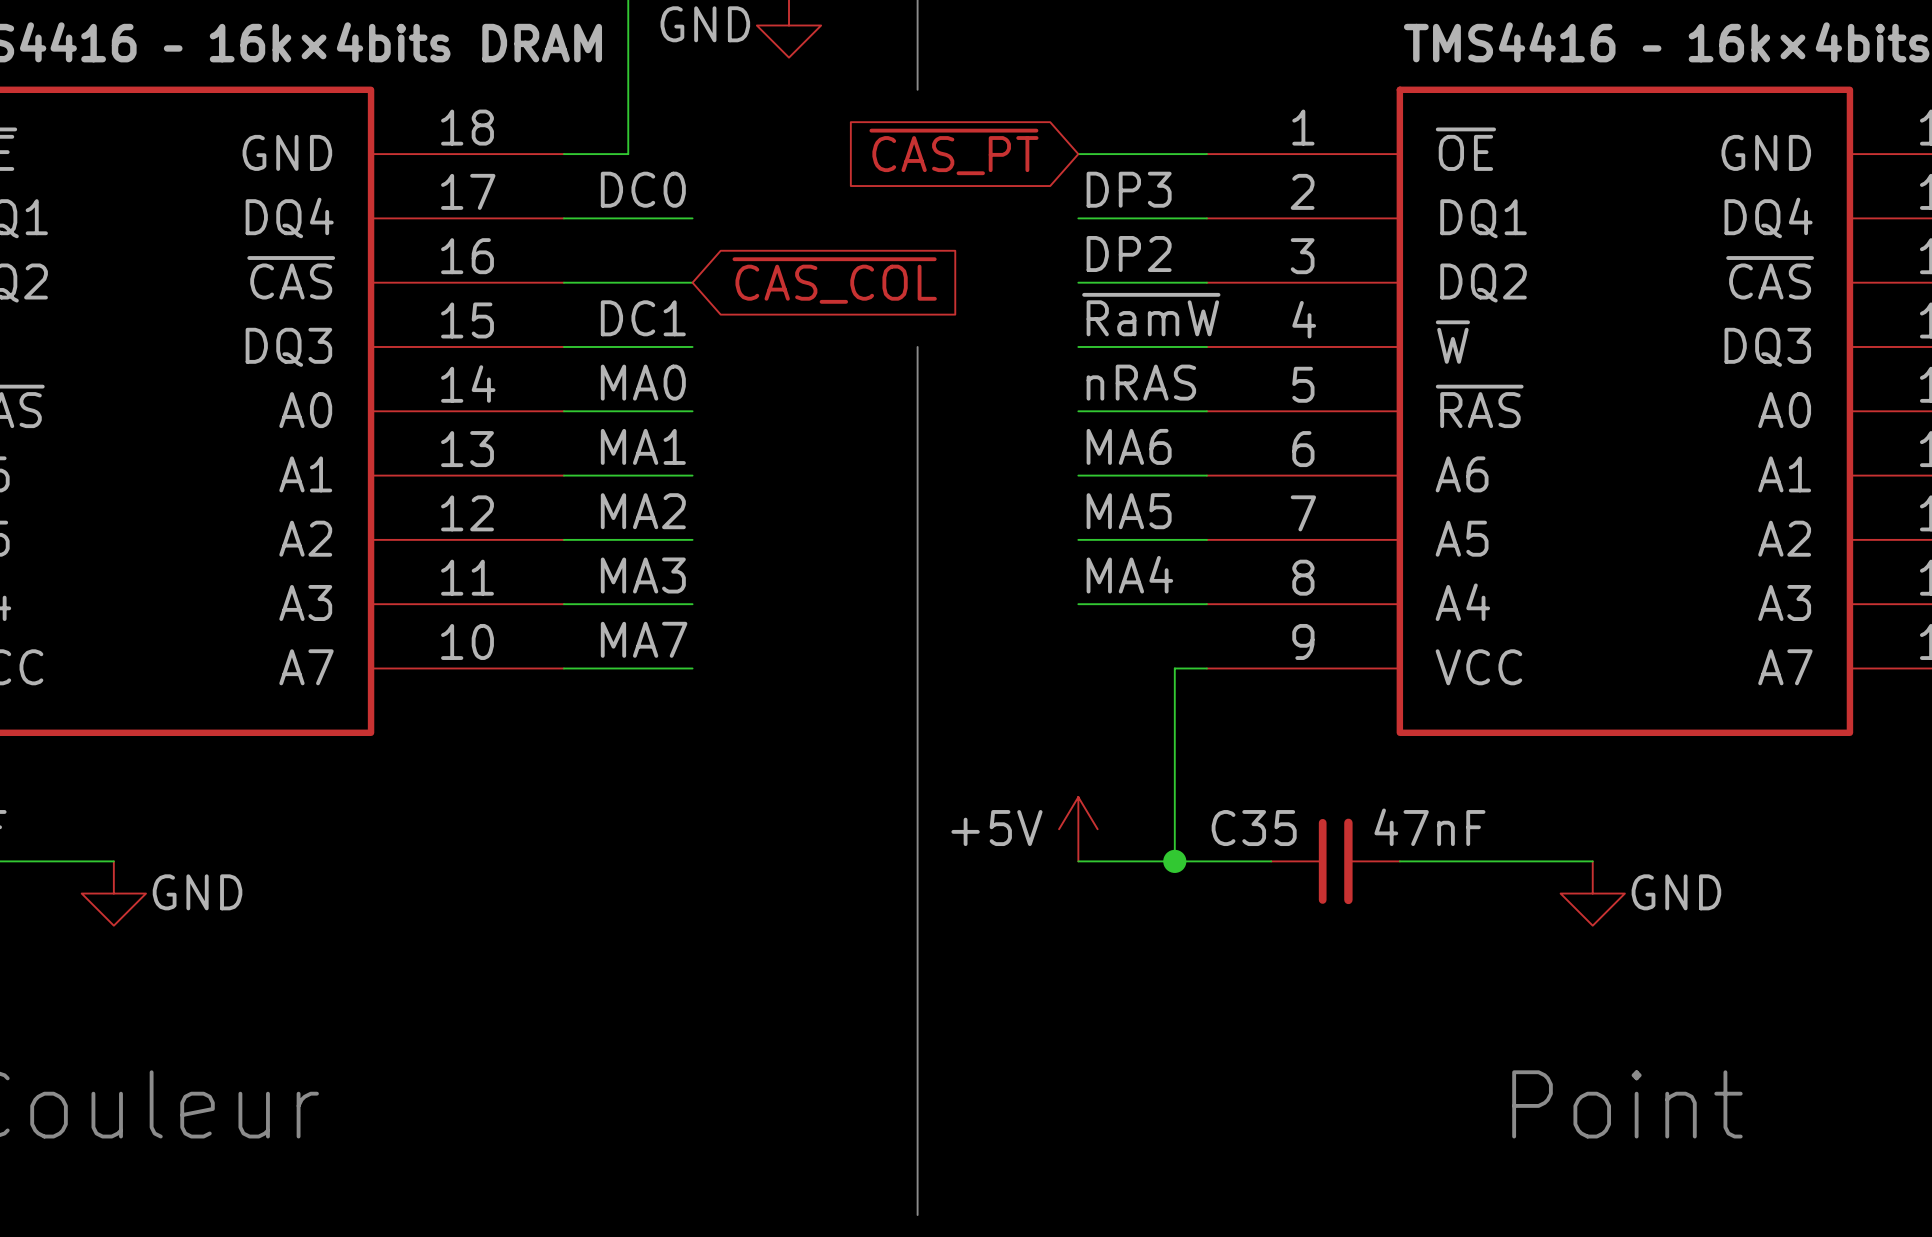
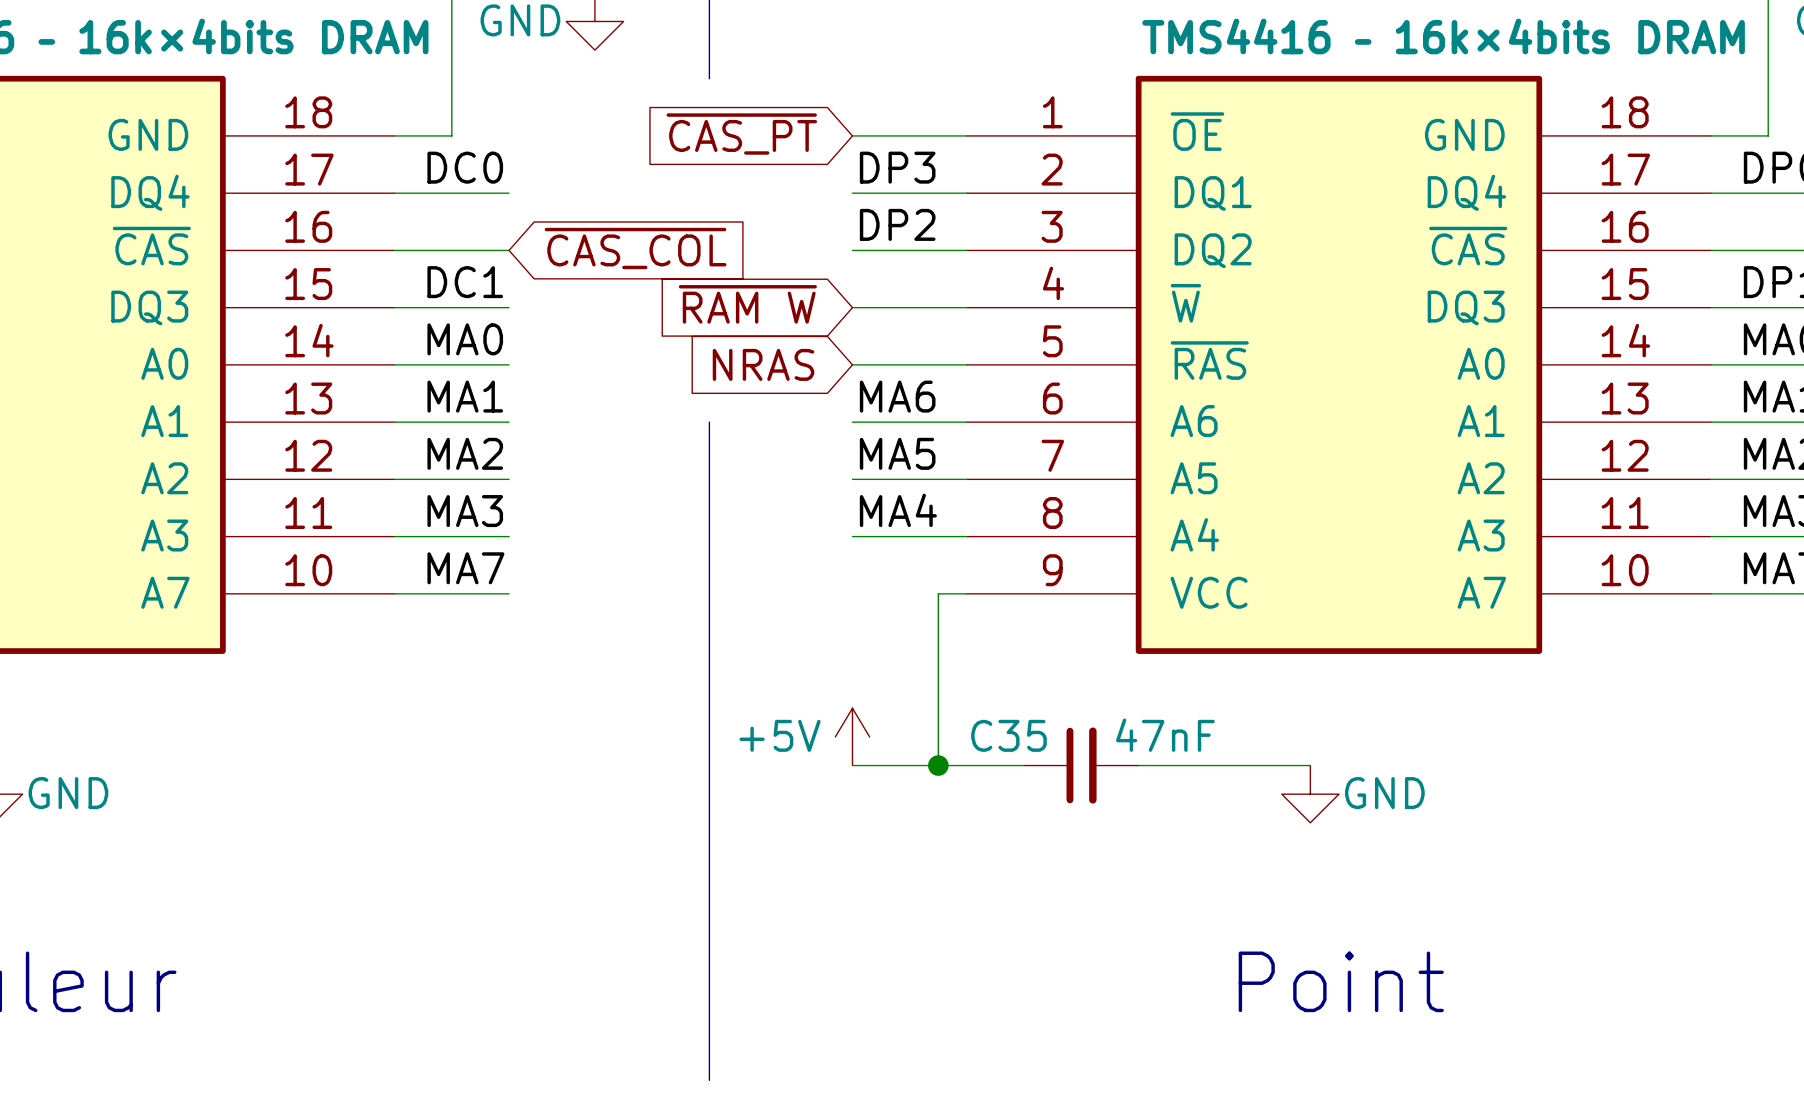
label: ~{RamW} (1151, 314) -> none
global label: none -> ~{RAM W} (747, 304)
line: (917, 346) (917, 475) -> none
label: nRAS (1141, 382) -> none
global label: none -> NRAS (763, 364)

